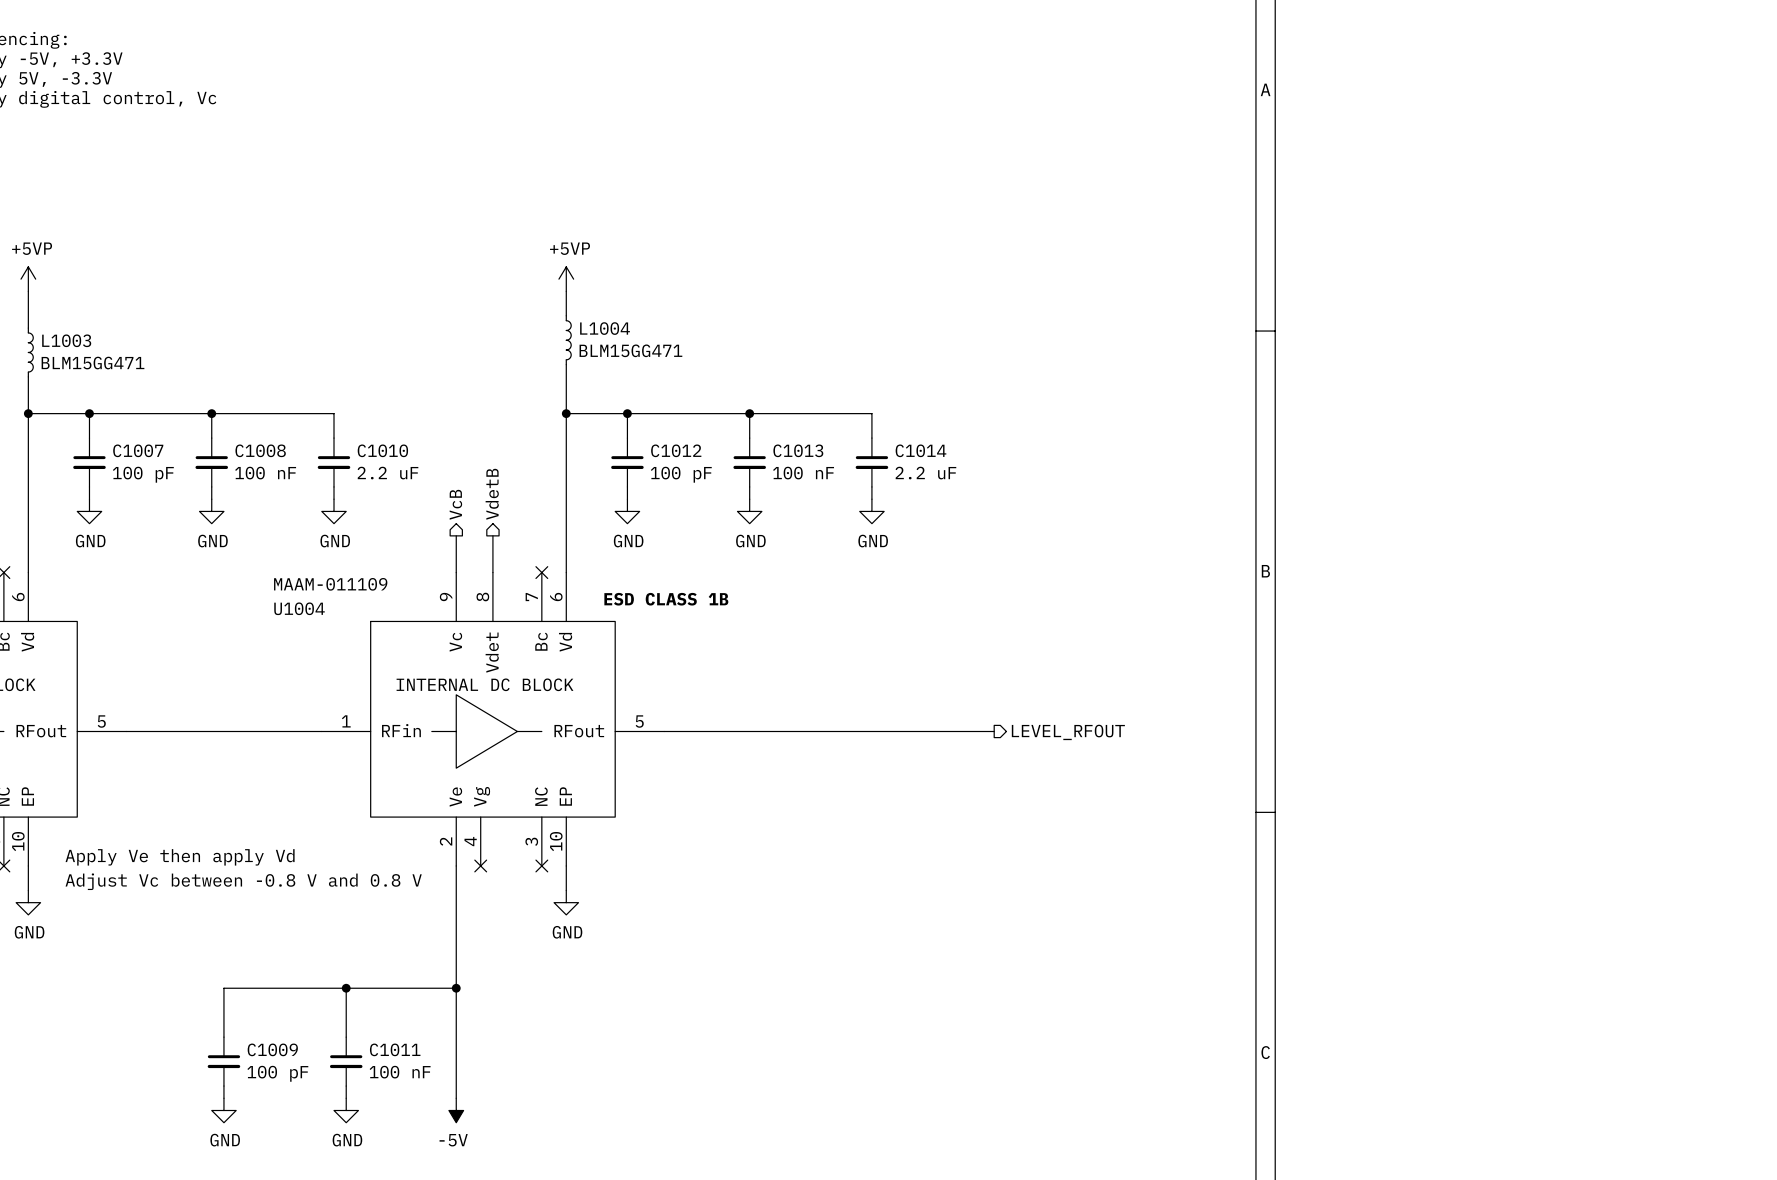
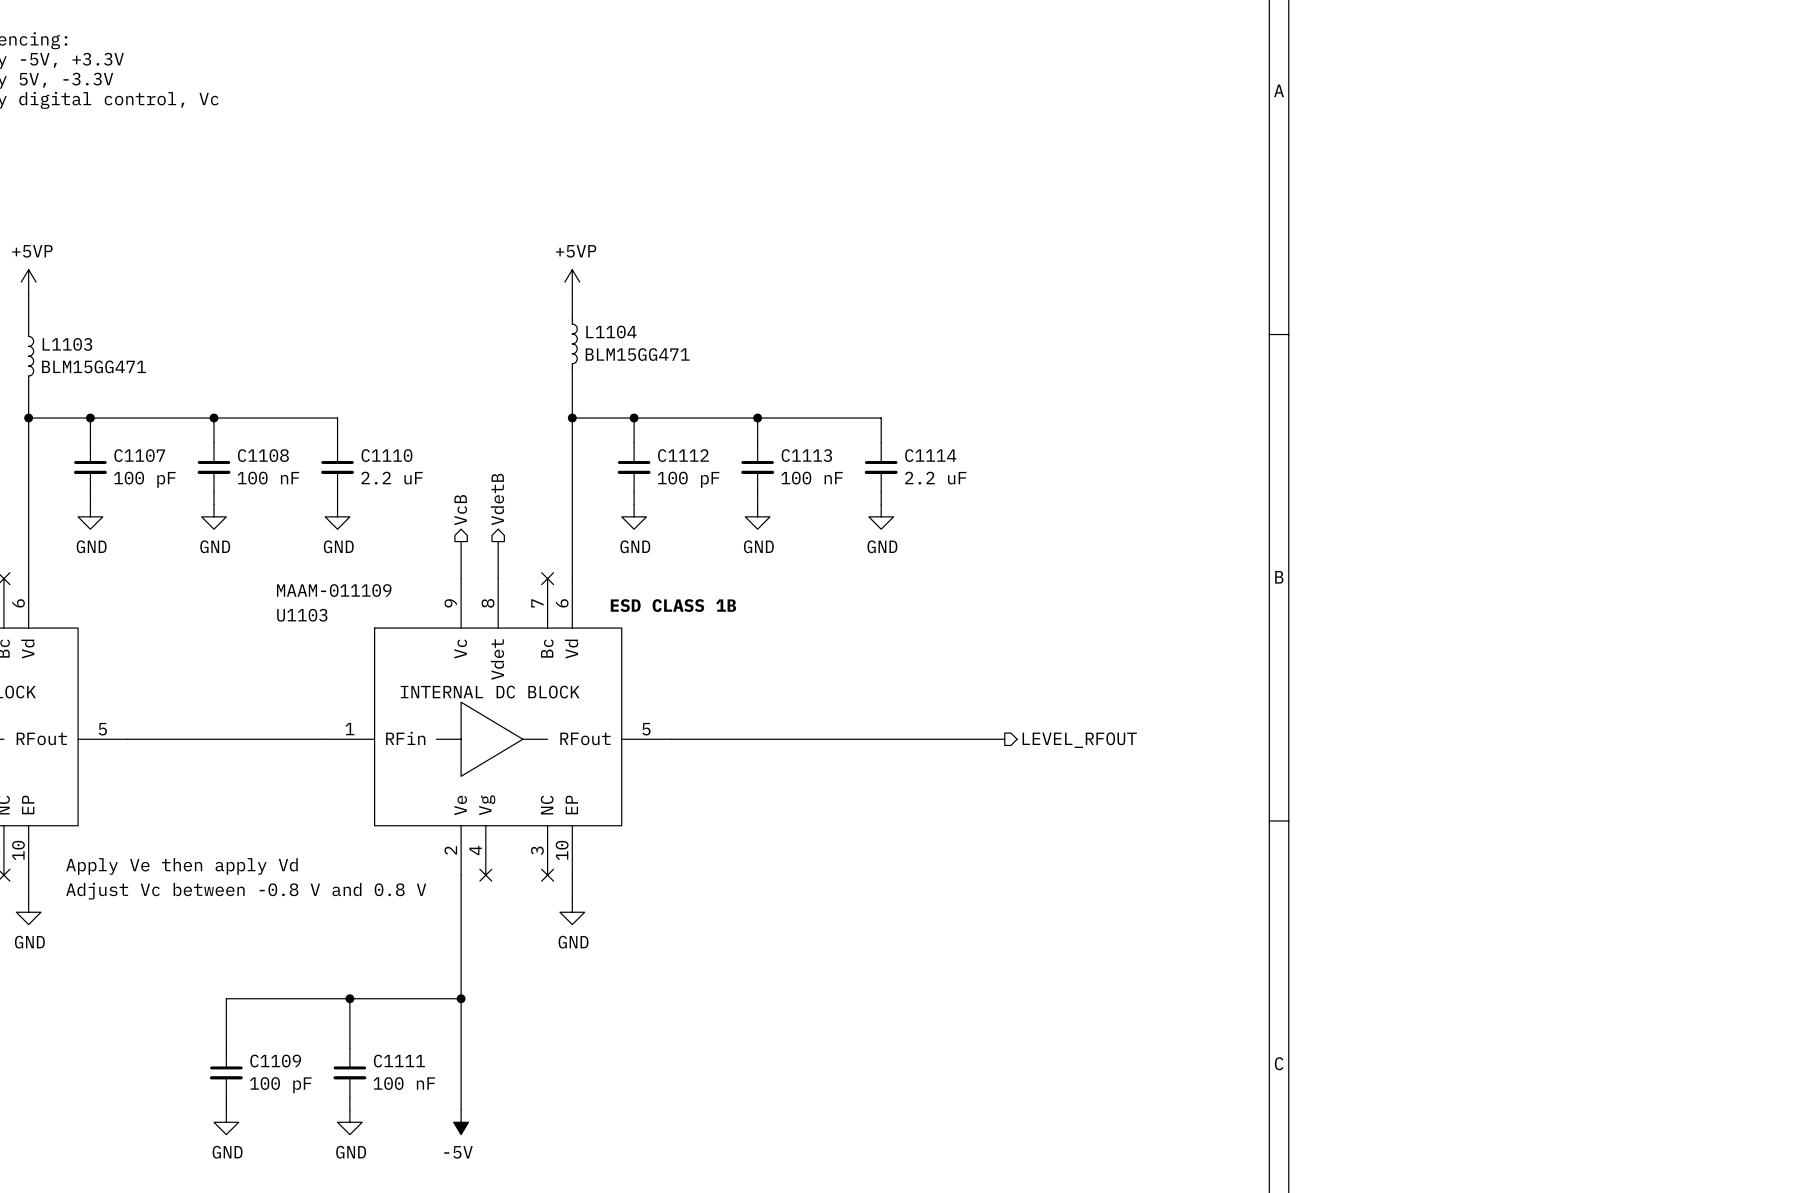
L1004 name: L1004 (605, 328) -> L1104 (611, 332)
L1003 name: L1003 (66, 340) -> L1103 (67, 344)
C1007 name: C1007 (138, 450) -> C1107 (139, 455)
C1008 name: C1008 (260, 450) -> C1108 (263, 455)
C1010 name: C1010 (382, 450) -> C1110 (386, 455)
C1012 name: C1012 (676, 450) -> C1112 (683, 455)
C1013 name: C1013 (798, 450) -> C1113 (806, 455)
C1014 name: C1014 (920, 450) -> C1114 (930, 455)
U1004 name: U1004 (299, 608) -> U1103 (302, 615)
C1009 name: C1009 (272, 1049) -> C1109 (275, 1061)
C1011 name: C1011 (395, 1049) -> C1111 (399, 1061)

